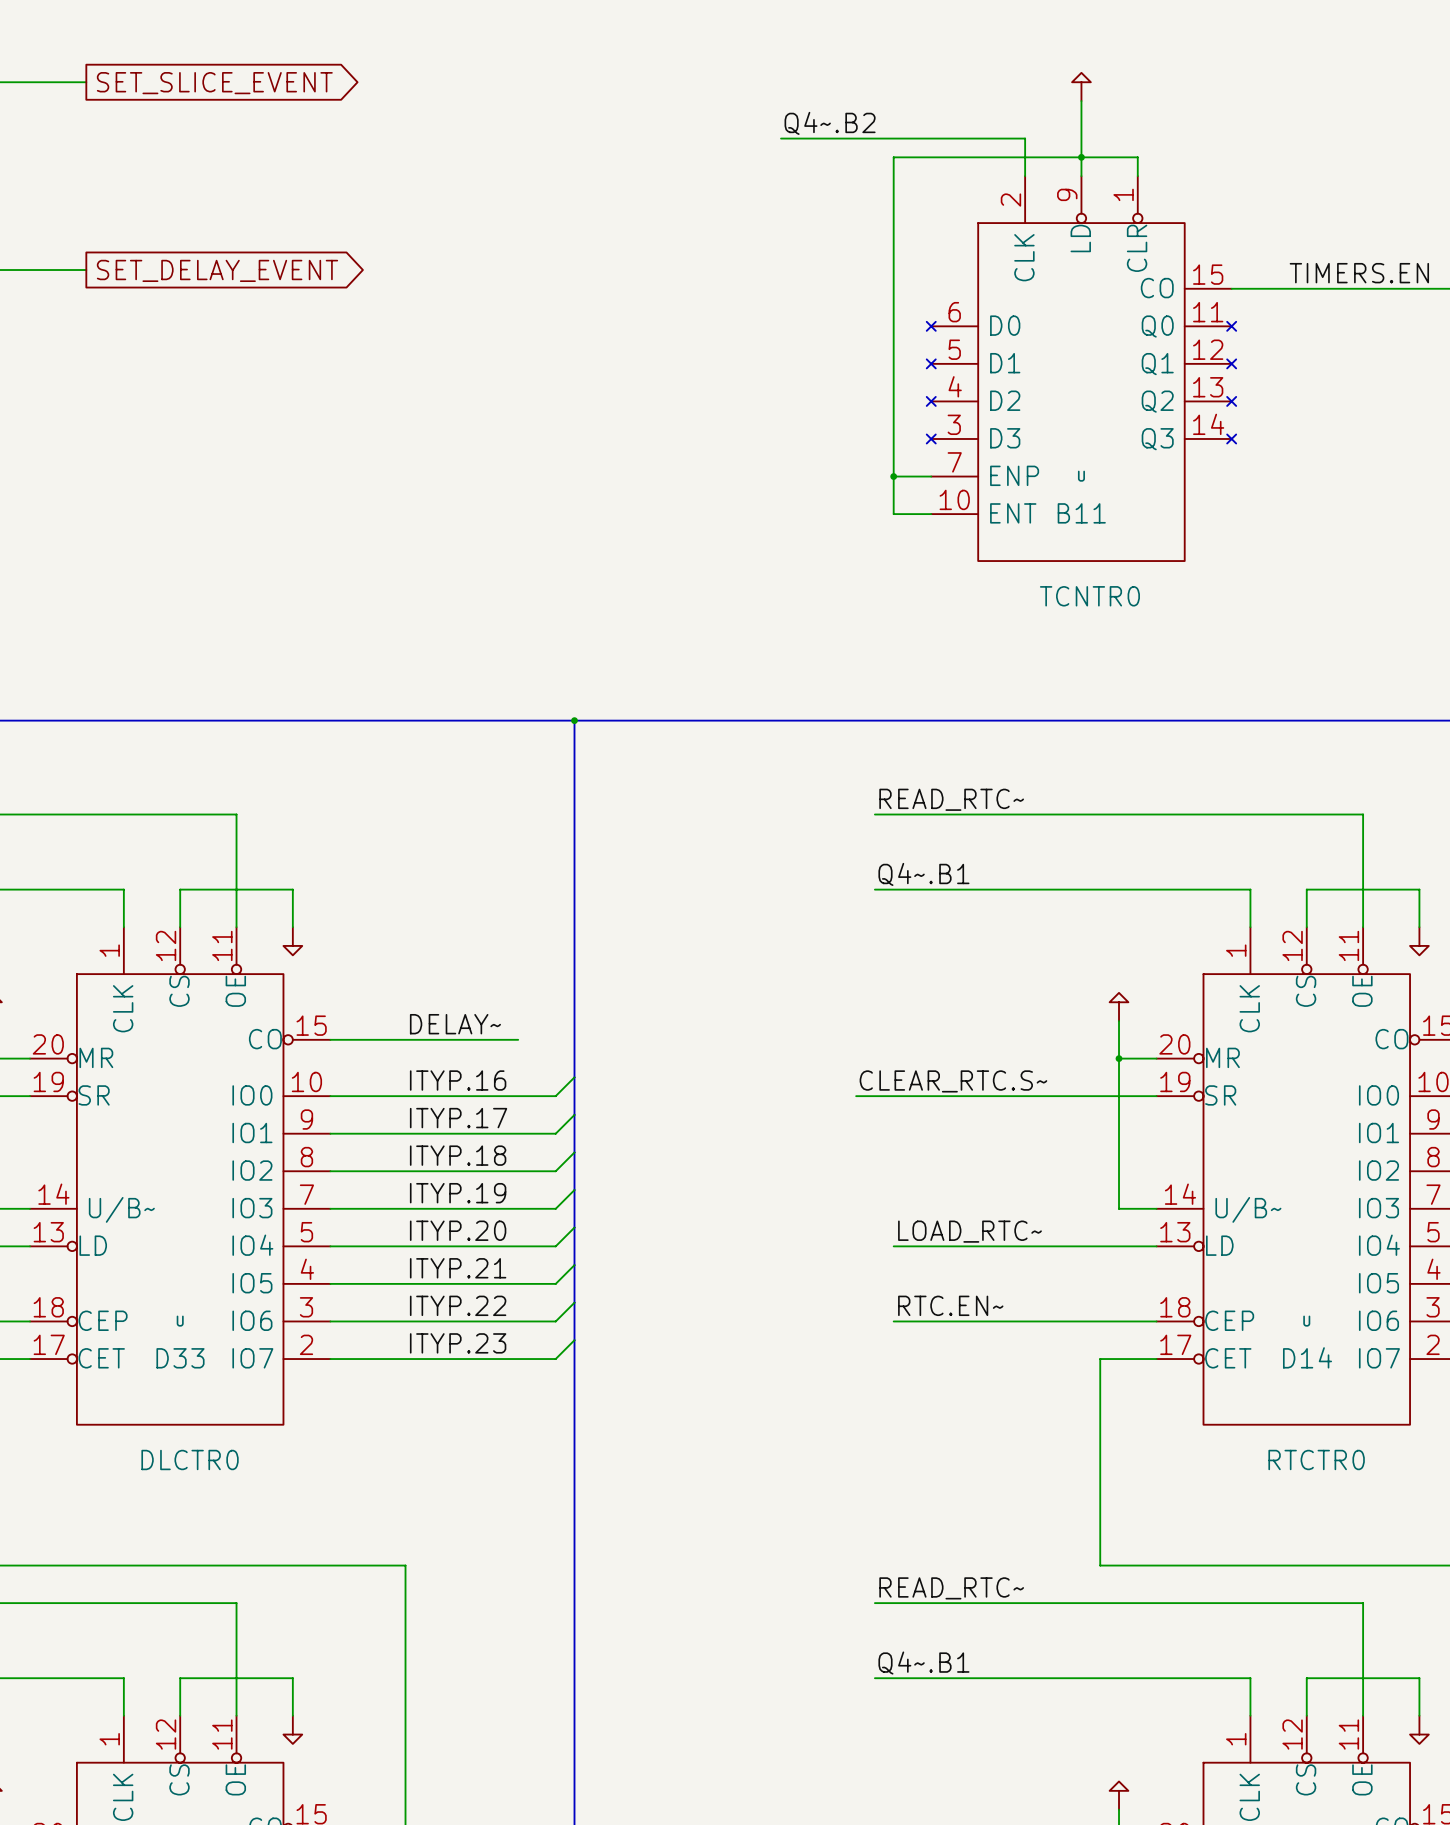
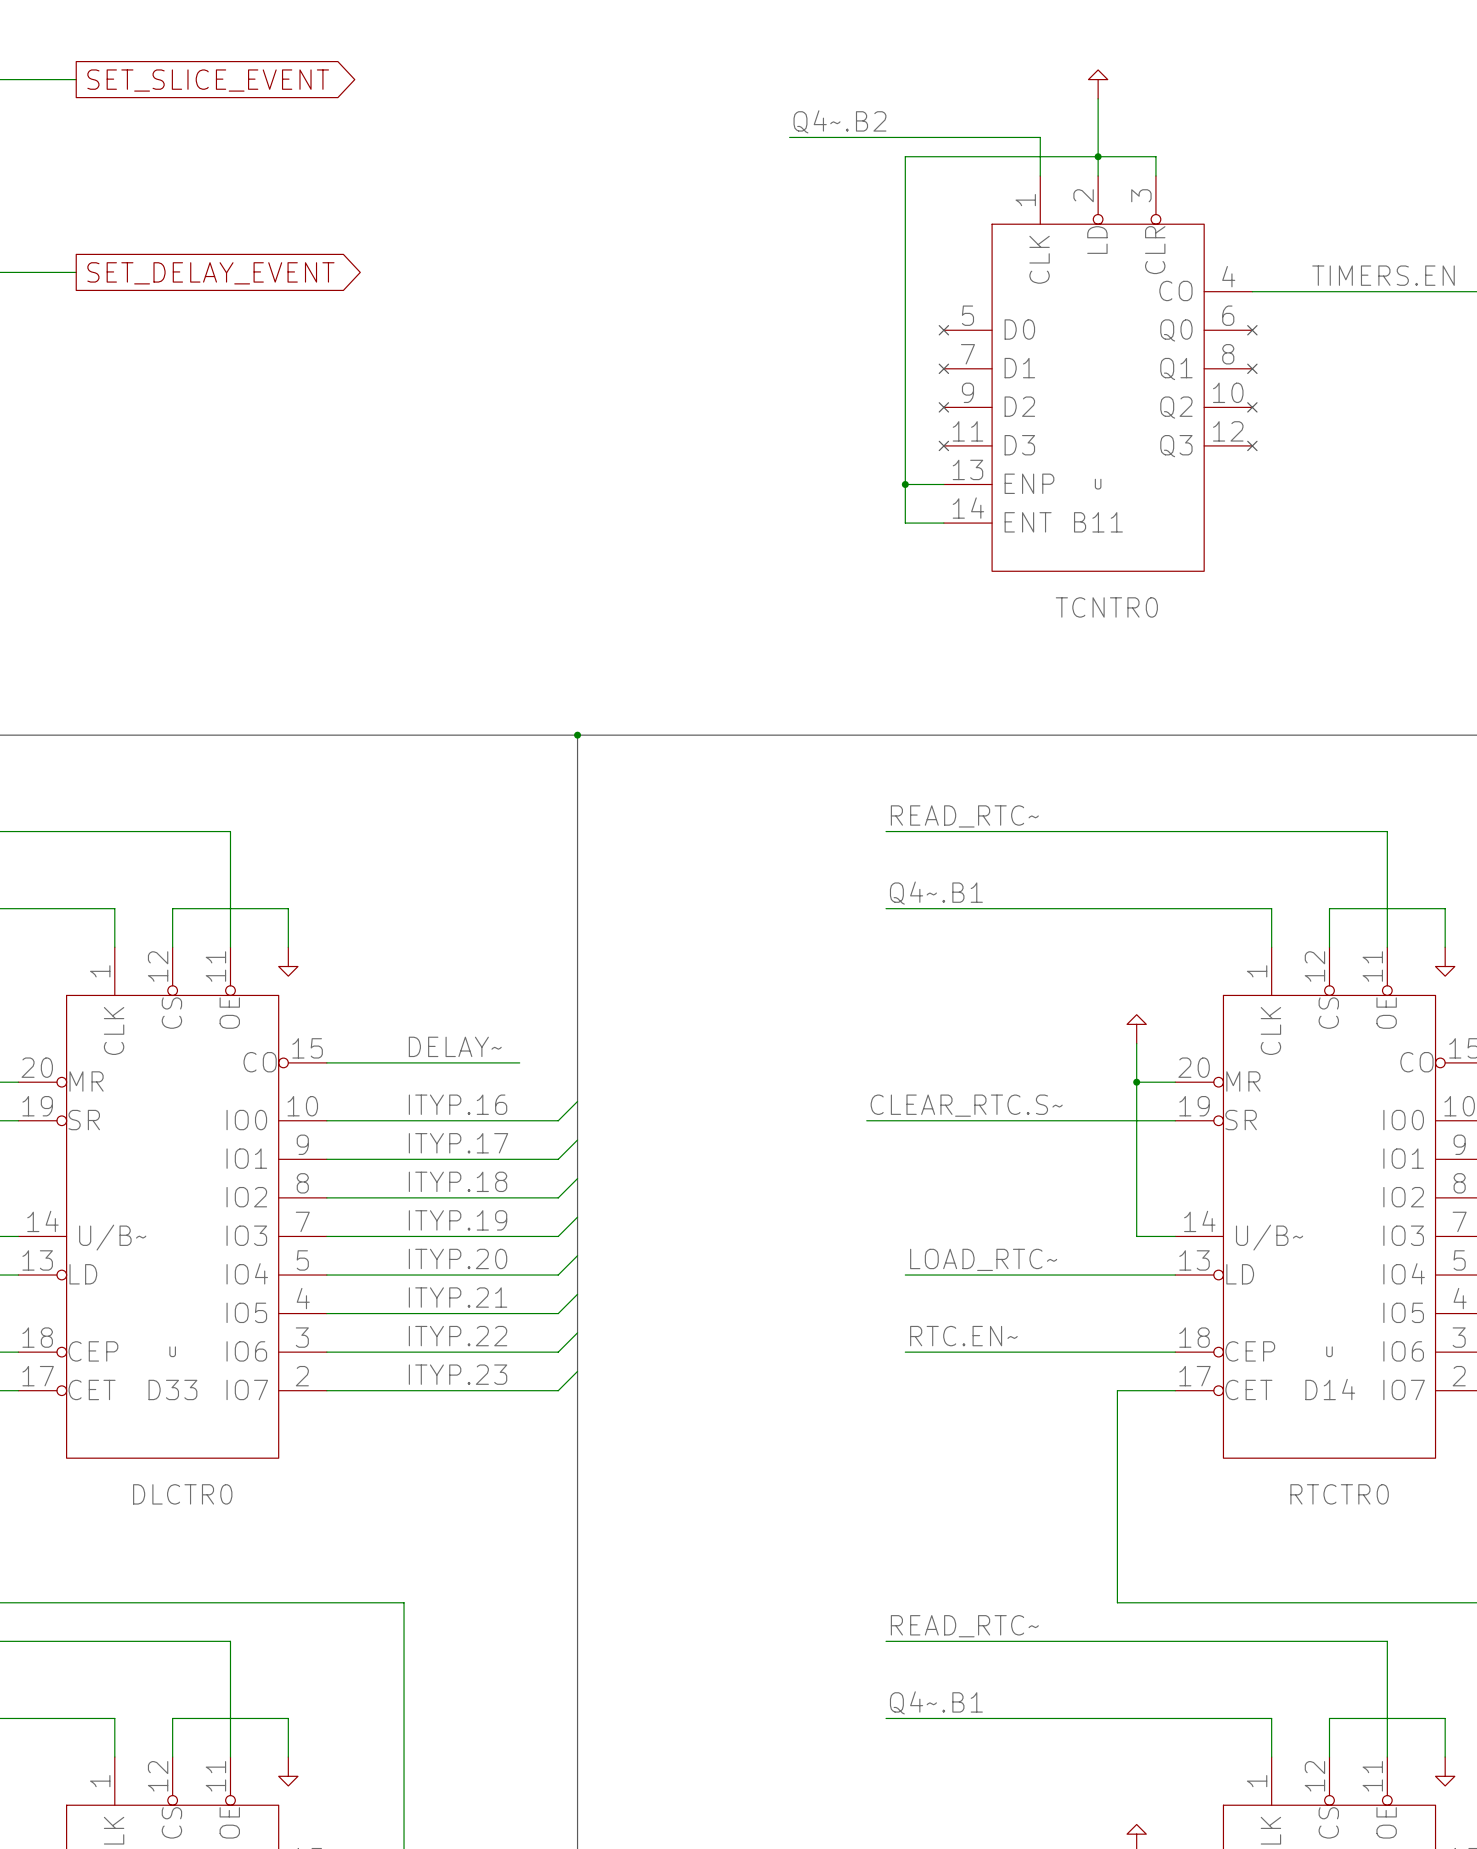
U symbol: [931, 176, 1232, 562] -> [943, 176, 1253, 572]

